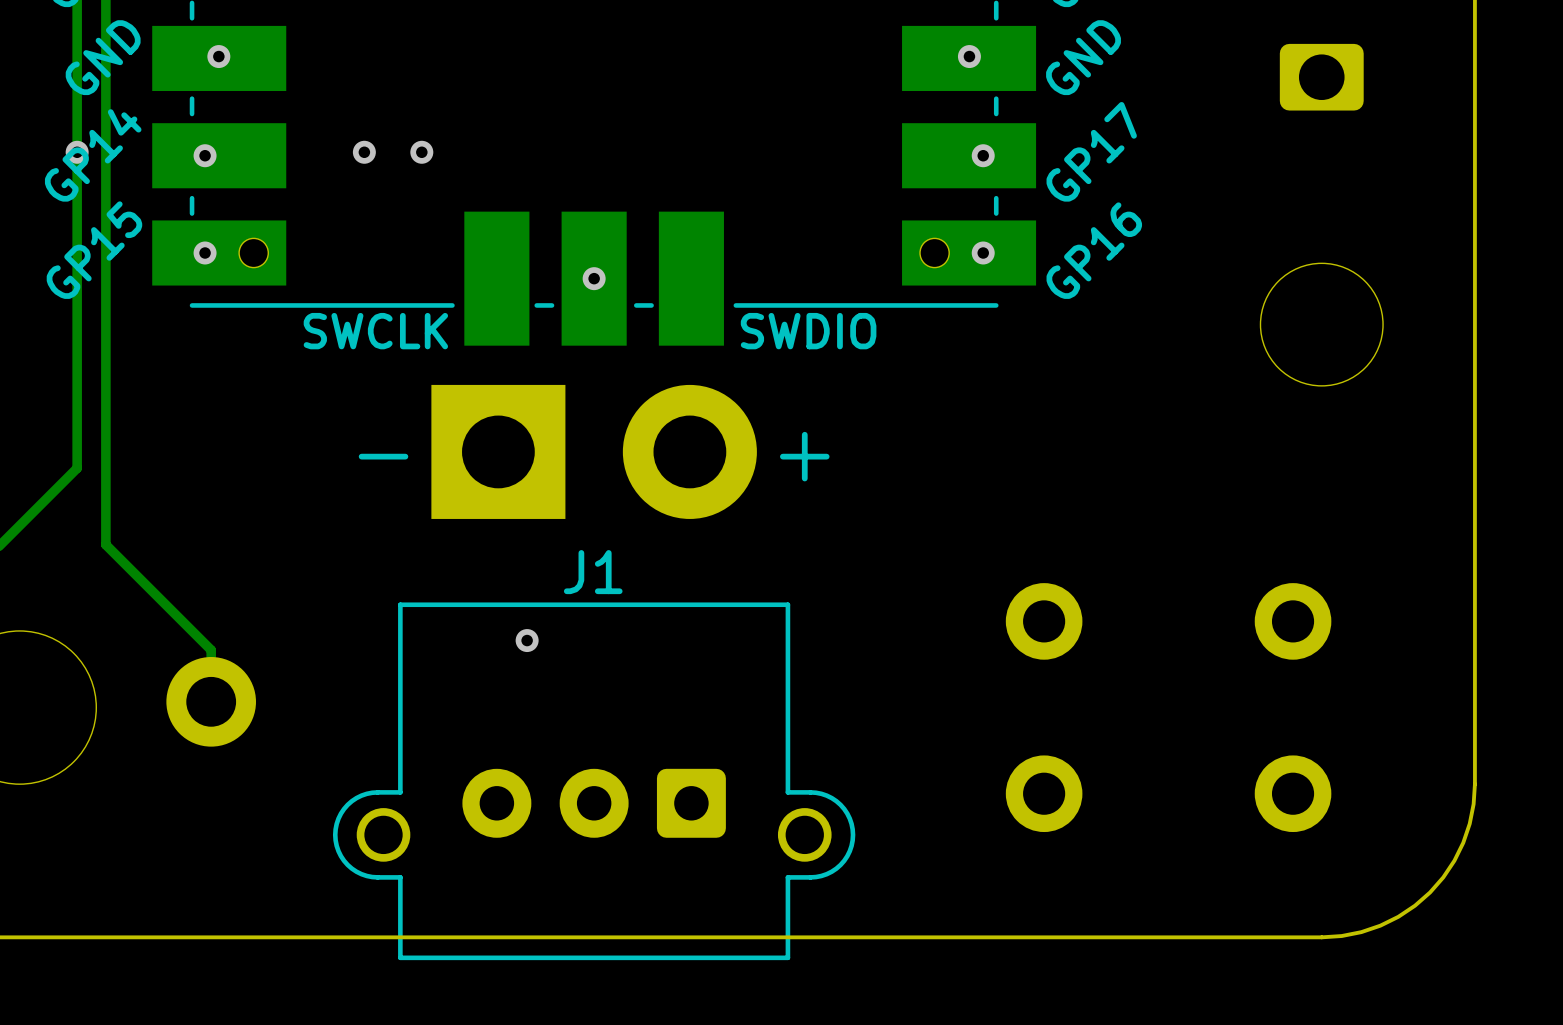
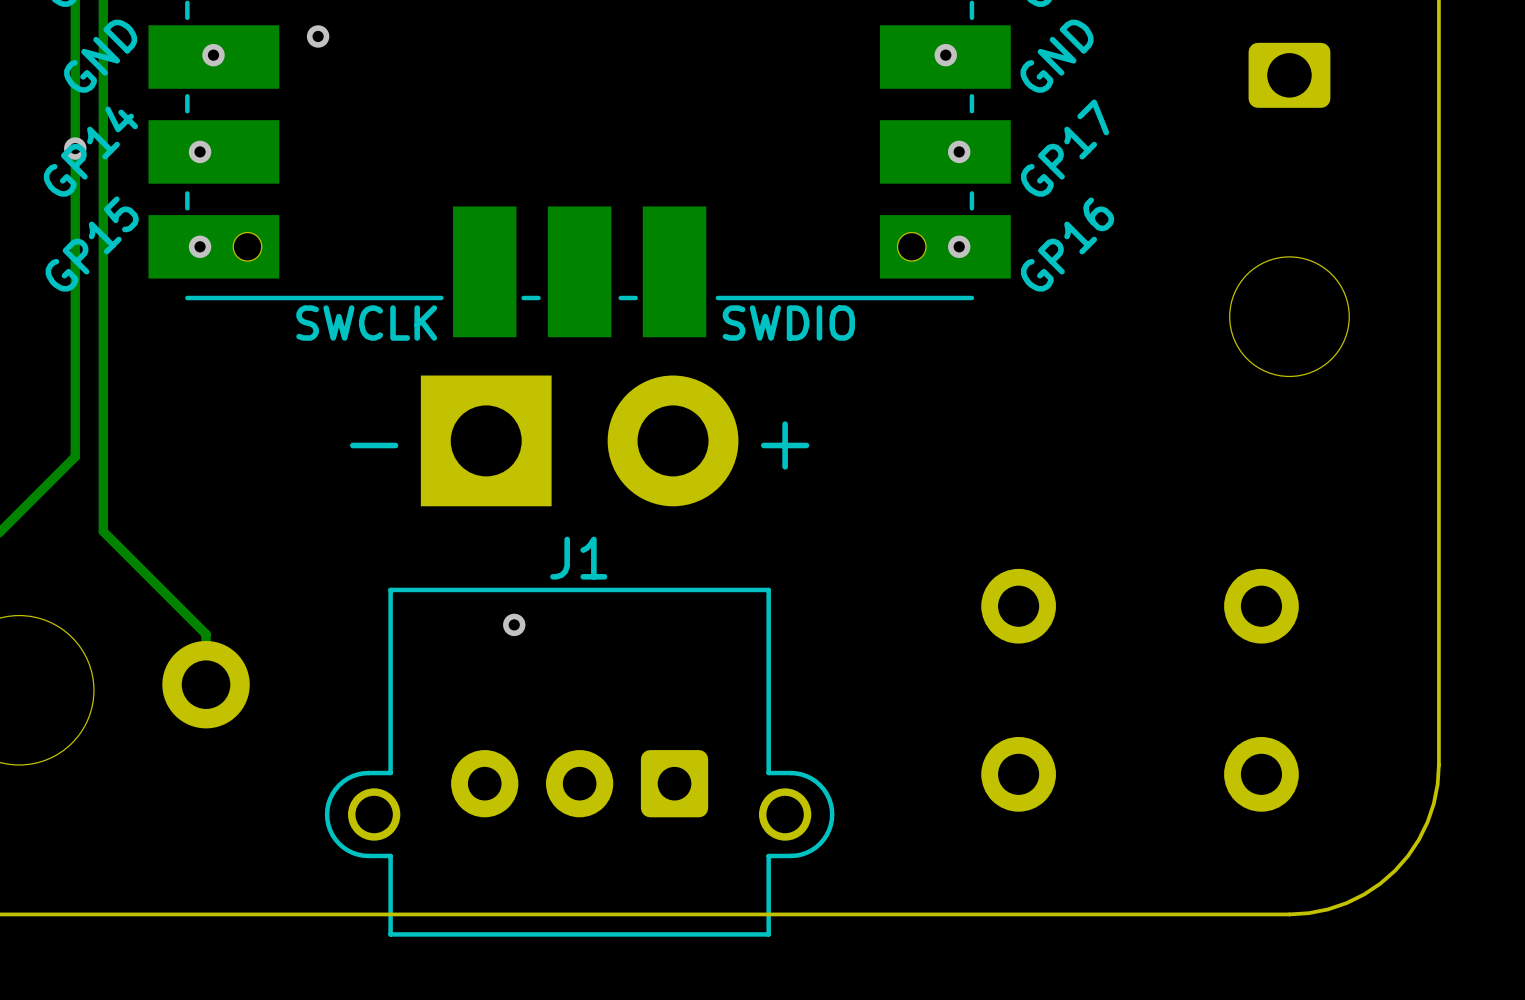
via: none -> (318, 36)
via: (364, 152) -> none
via: (421, 152) -> none
via: (594, 278) -> none

